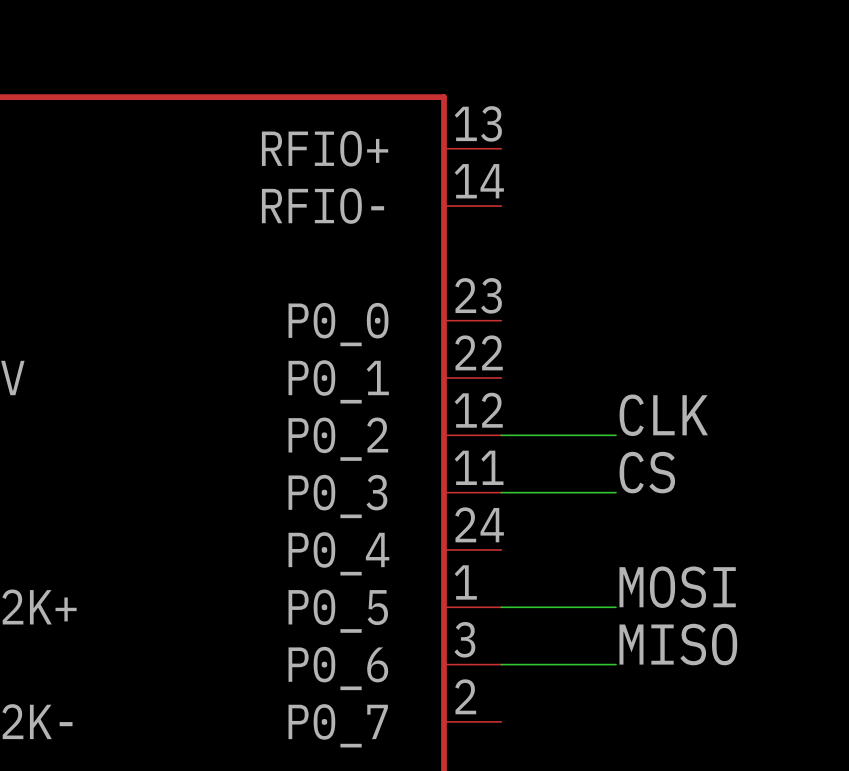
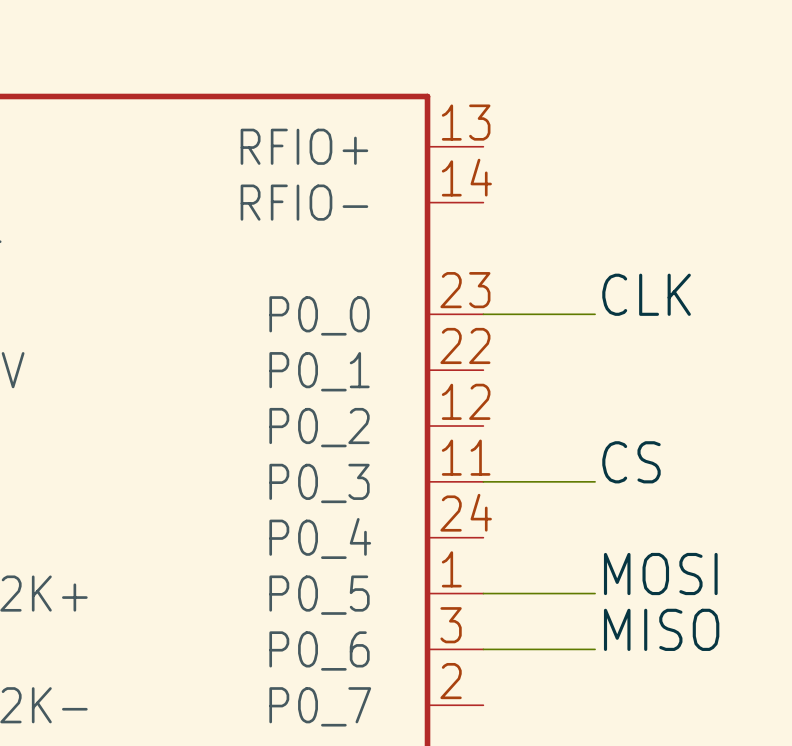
label position: CLK (663, 415) -> CLK (646, 294)
wire: (501, 435) (615, 435) -> (483, 314) (595, 314)

